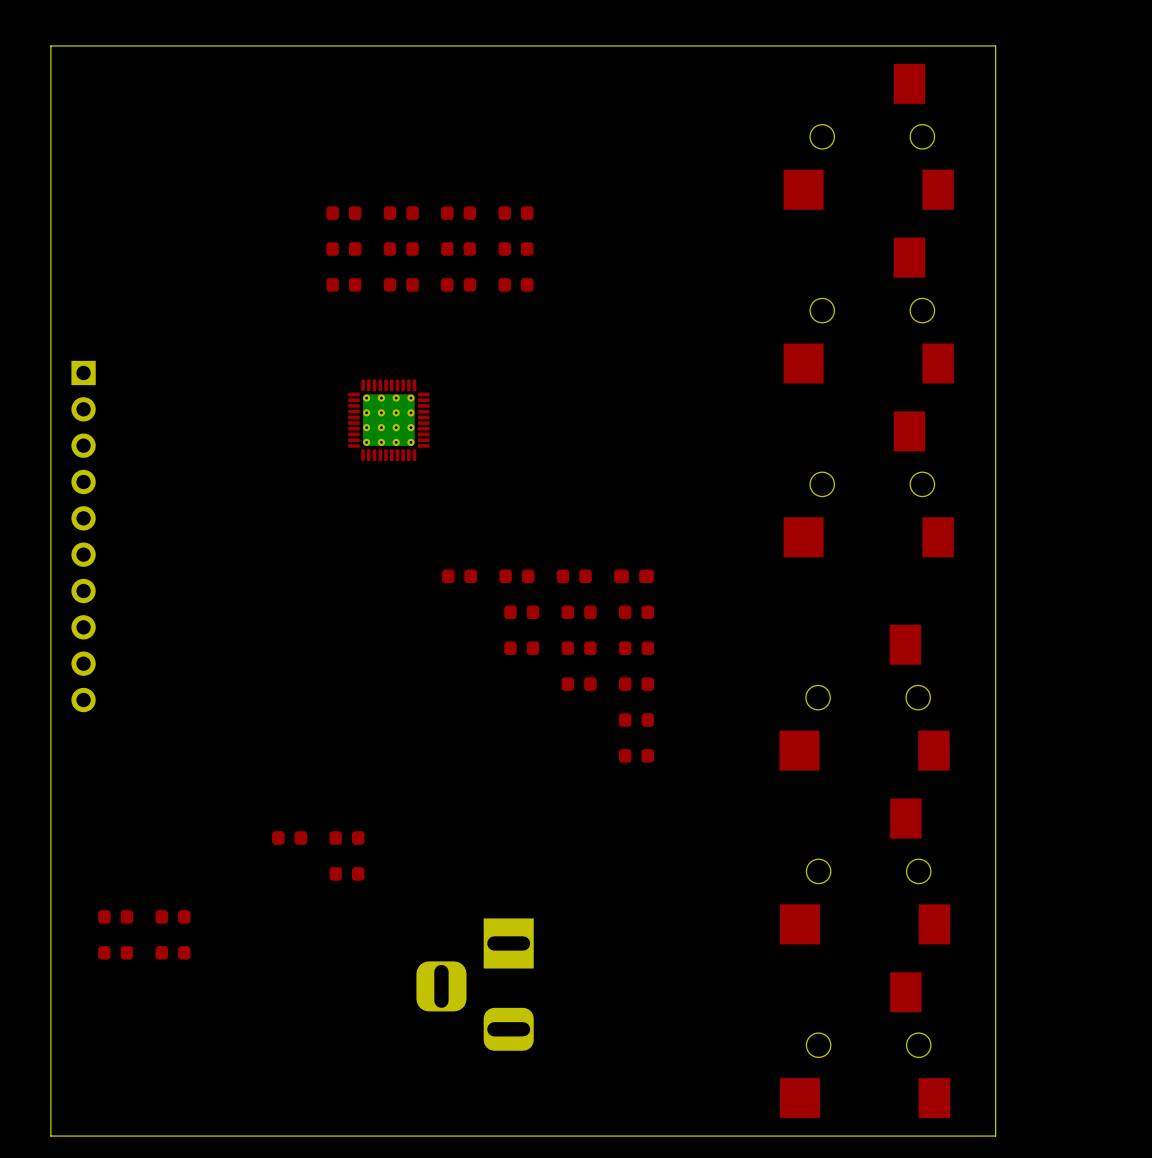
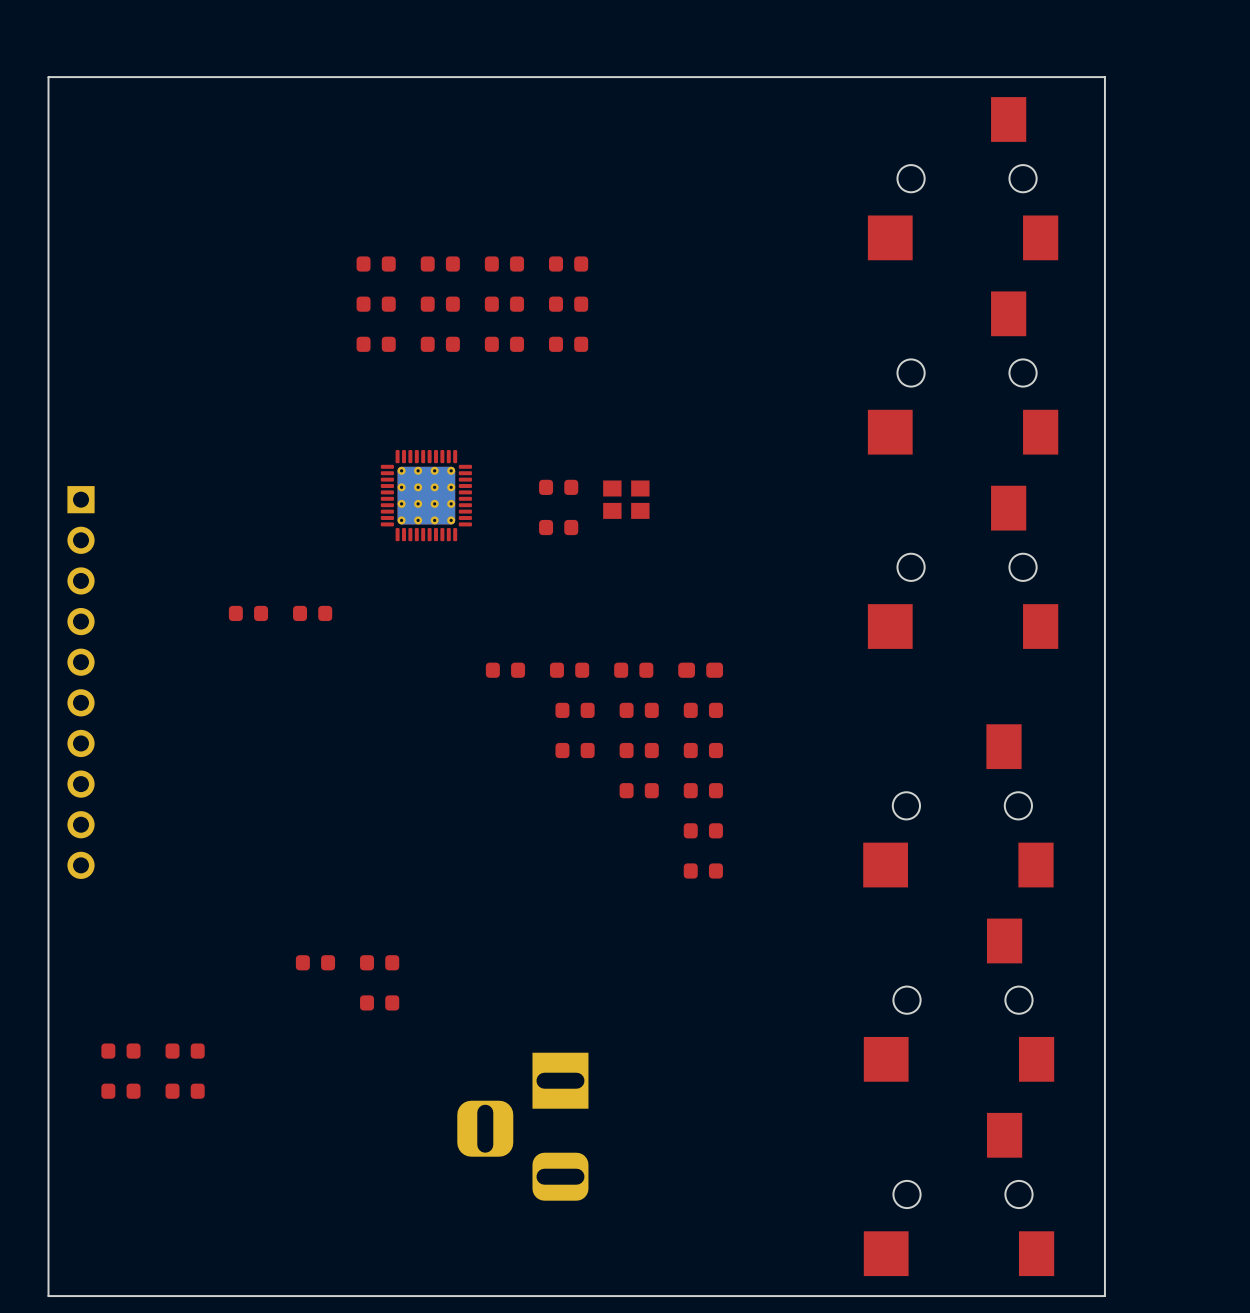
part: none -> (558, 487)
part: none -> (626, 499)
part: none -> (558, 527)
part: none -> (248, 613)
part: none -> (312, 613)
part position: (83, 536) -> (81, 682)

